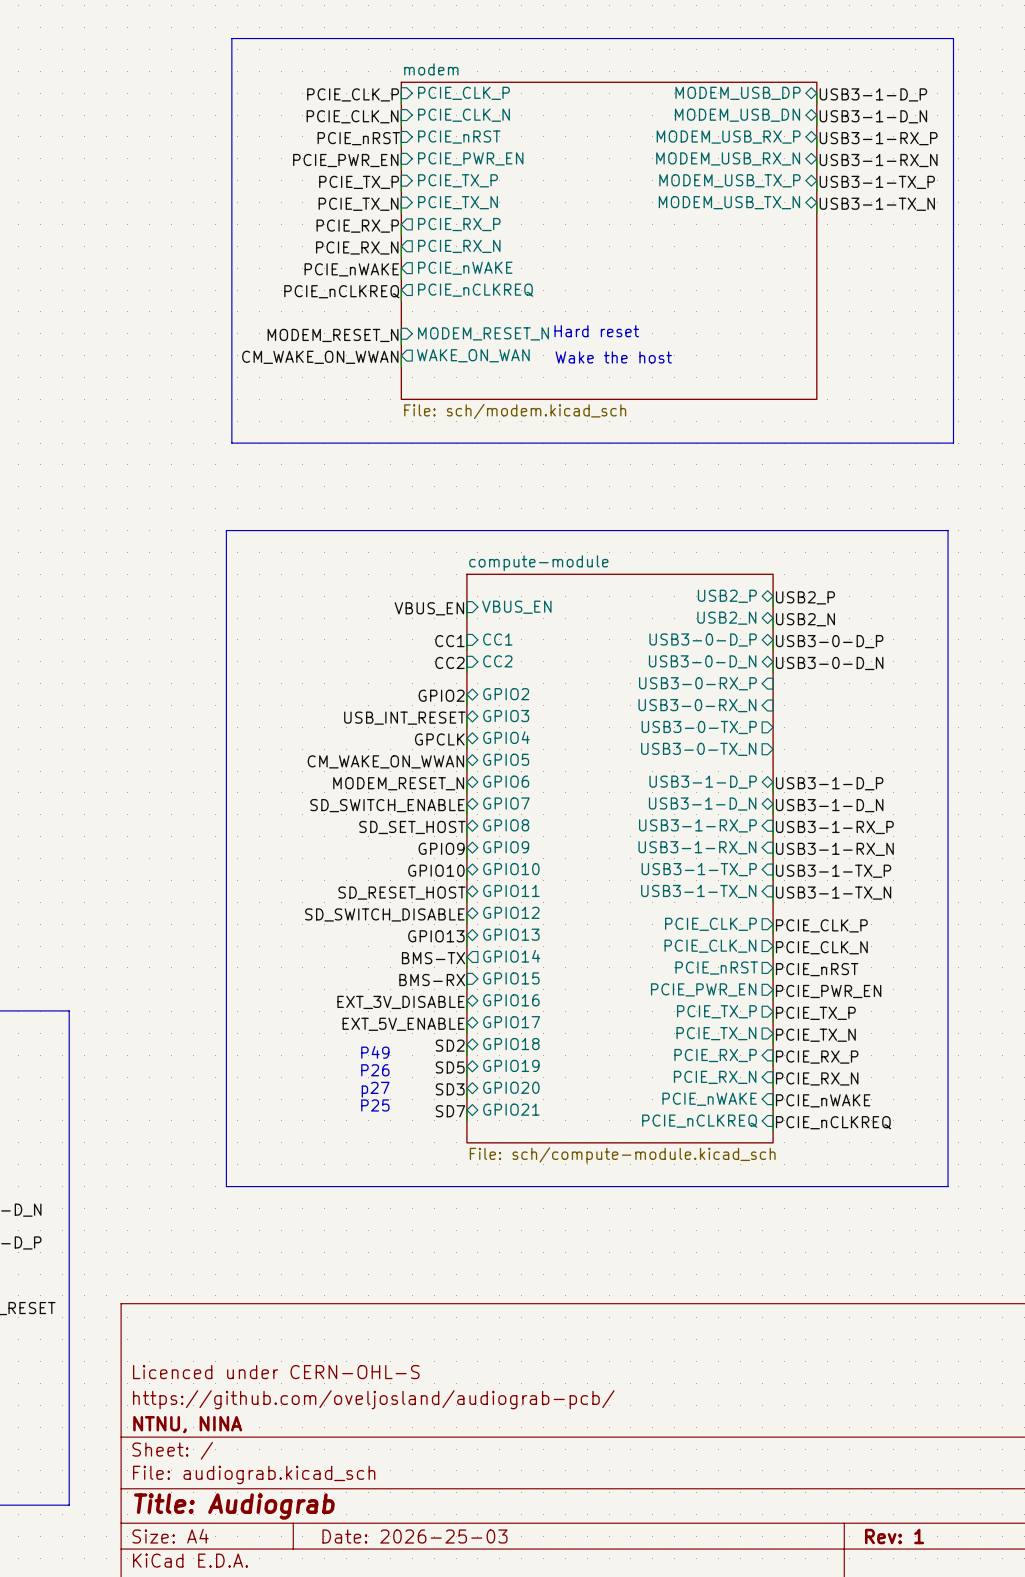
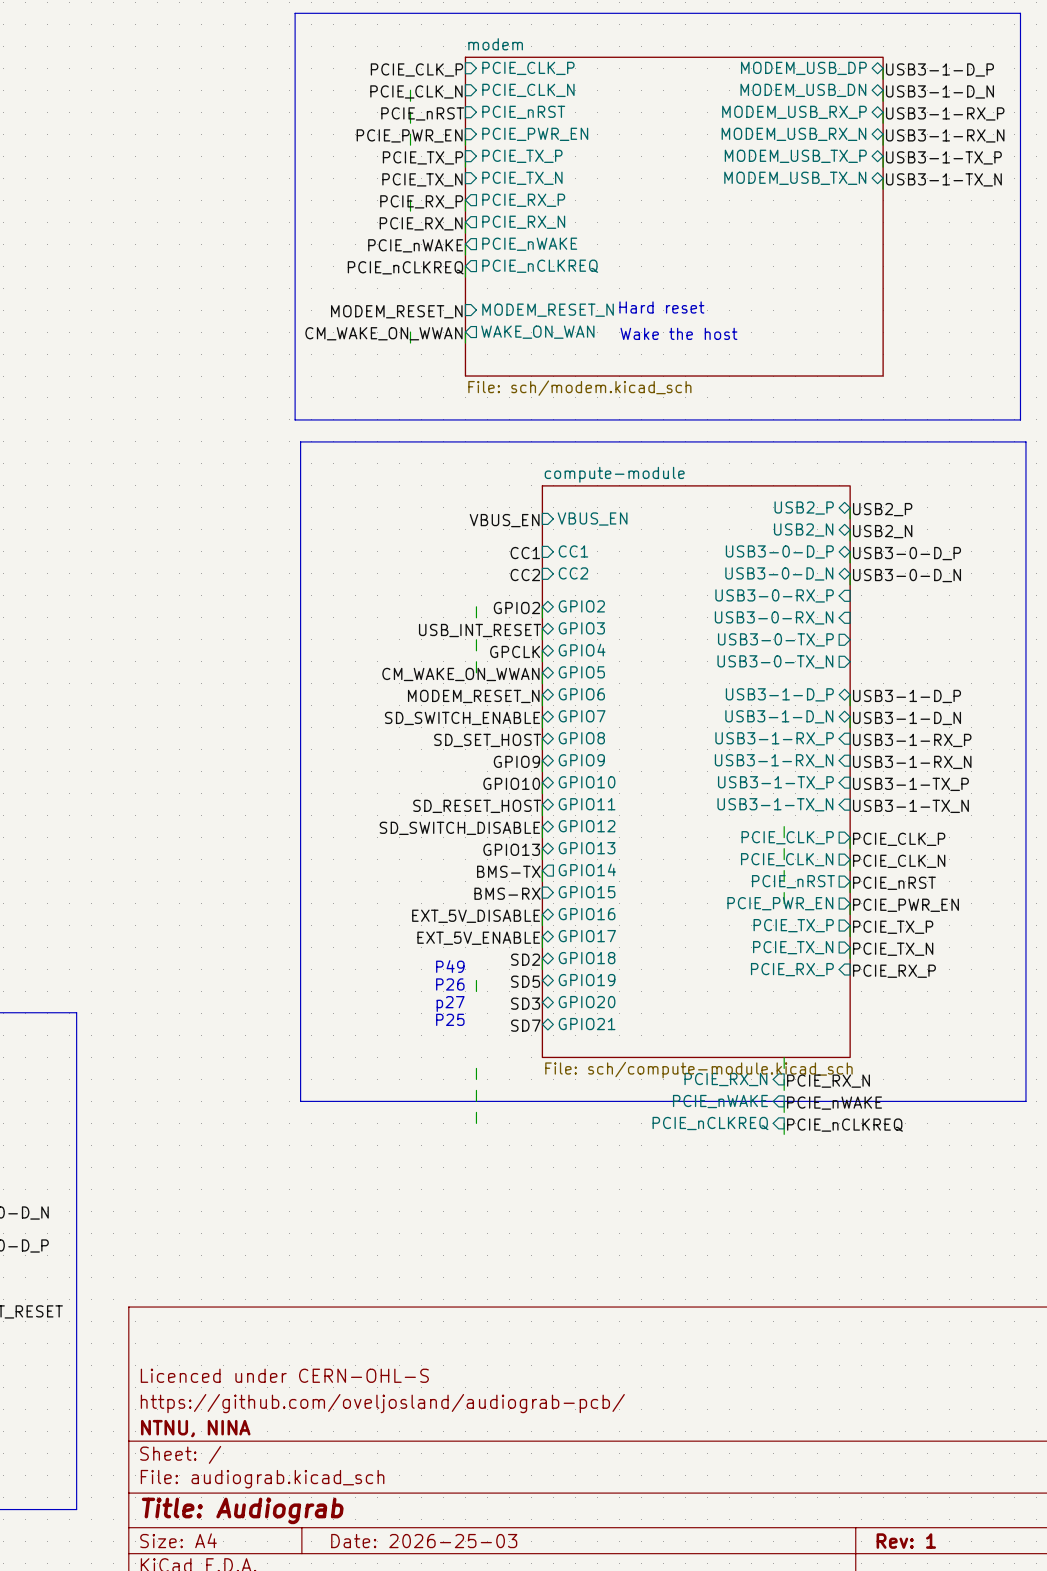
line: none -> (295, 13) (1020, 13) (1020, 419) (295, 419) (295, 13)
sheet pin position: PCIE_CLK_P (463, 93) -> PCIE_CLK_P (528, 68)
sheet pin position: MODEM_USB_DP (738, 93) -> MODEM_USB_DP (803, 68)
wire: (816, 93) (816, 104) -> (883, 68) (883, 79)
label position: PCIE_CLK_P (353, 94) -> PCIE_CLK_P (416, 69)
label position: USB3-1-D_P (873, 94) -> USB3-1-D_P (939, 69)
sheet pin position: PCIE_CLK_N (463, 115) -> PCIE_CLK_N (528, 90)
sheet pin position: MODEM_USB_DN (737, 115) -> MODEM_USB_DN (803, 90)
wire: (816, 115) (816, 126) -> (883, 90) (883, 101)
label position: PCIE_CLK_N (352, 116) -> PCIE_CLK_N (416, 91)
label position: USB3-1-D_N (873, 116) -> USB3-1-D_N (939, 91)
wire: (816, 136) (816, 147) -> (883, 112) (883, 123)
sheet pin position: PCIE_nRST (459, 137) -> PCIE_nRST (523, 112)
sheet pin position: MODEM_USB_RX_P (728, 137) -> MODEM_USB_RX_P (794, 112)
label position: PCIE_nRST (358, 138) -> PCIE_nRST (422, 113)
label position: USB3-1-RX_P (878, 138) -> USB3-1-RX_P (945, 113)
sheet pin position: PCIE_PWR_EN (470, 158) -> PCIE_PWR_EN (535, 134)
sheet pin position: MODEM_USB_RX_N (728, 158) -> MODEM_USB_RX_N (793, 134)
wire: (816, 158) (816, 169) -> (883, 134) (883, 145)
label position: PCIE_PWR_EN (345, 160) -> PCIE_PWR_EN (409, 135)
label position: USB3-1-RX_N (878, 160) -> USB3-1-RX_N (945, 135)
sheet pin position: PCIE_TX_P (457, 180) -> PCIE_TX_P (522, 156)
sheet pin position: MODEM_USB_TX_P (729, 180) -> MODEM_USB_TX_P (795, 156)
wire: (816, 180) (816, 191) -> (883, 156) (883, 167)
label position: PCIE_TX_P (359, 182) -> PCIE_TX_P (422, 157)
label position: USB3-1-TX_P (877, 182) -> USB3-1-TX_P (943, 157)
sheet pin position: PCIE_TX_N (457, 202) -> PCIE_TX_N (522, 178)
sheet pin position: MODEM_USB_TX_N (729, 202) -> MODEM_USB_TX_N (795, 178)
wire: (816, 202) (816, 213) -> (883, 178) (883, 189)
label position: PCIE_TX_N (358, 204) -> PCIE_TX_N (422, 179)
label position: USB3-1-TX_N (877, 204) -> USB3-1-TX_N (943, 179)
wire: (401, 224) (401, 235) -> (465, 200) (465, 211)
sheet pin position: PCIE_RX_P (459, 224) -> PCIE_RX_P (523, 200)
label position: PCIE_RX_P (357, 226) -> PCIE_RX_P (421, 201)
sheet modem position: (609, 240) -> (674, 216)
wire: (401, 246) (401, 257) -> (465, 222) (465, 233)
sheet pin position: PCIE_RX_N (459, 246) -> PCIE_RX_N (523, 222)
label position: PCIE_RX_N (357, 247) -> PCIE_RX_N (421, 223)
wire: (401, 268) (401, 279) -> (465, 244) (465, 255)
sheet pin position: PCIE_nWAKE (465, 268) -> PCIE_nWAKE (529, 244)
label position: PCIE_nWAKE (351, 269) -> PCIE_nWAKE (415, 245)
wire: (401, 290) (401, 300) -> (465, 266) (465, 277)
sheet pin position: PCIE_nCLKREQ (475, 290) -> PCIE_nCLKREQ (540, 266)
label position: PCIE_nCLKREQ (341, 291) -> PCIE_nCLKREQ (405, 267)
text position: Hard reset (596, 331) -> Hard reset (661, 307)
sheet pin position: MODEM_RESET_N (483, 333) -> MODEM_RESET_N (548, 310)
label position: MODEM_RESET_N (333, 335) -> MODEM_RESET_N (396, 311)
wire: (401, 355) (401, 366) -> (465, 332) (465, 343)
sheet pin position: WAKE_ON_WAN (473, 355) -> WAKE_ON_WAN (537, 332)
label position: CM_WAKE_ON_WWAN (320, 357) -> CM_WAKE_ON_WWAN (383, 333)
text position: Wake the host (613, 357) -> Wake the host (678, 333)
line: (291, 443) (231, 443) (231, 38) (953, 38) (953, 443) -> (300, 441) (300, 1101) (1025, 1101) (1025, 441) (965, 441)
line: (226, 530) (948, 530) (948, 1186) (226, 1186) (226, 530) -> none
sheet pin position: USB2_P (727, 596) -> USB2_P (804, 508)
wire: (773, 596) (773, 607) -> (850, 507) (850, 518)
label position: USB2_P (805, 597) -> USB2_P (882, 509)
sheet pin position: VBUS_EN (516, 607) -> VBUS_EN (592, 519)
label position: VBUS_EN (429, 608) -> VBUS_EN (504, 520)
sheet pin position: USB2_N (726, 618) -> USB2_N (803, 529)
wire: (773, 618) (773, 628) -> (850, 529) (850, 540)
label position: USB2_N (805, 619) -> USB2_N (882, 531)
sheet pin position: CC1 (497, 639) -> CC1 (573, 551)
wire: (773, 639) (773, 650) -> (850, 551) (850, 562)
sheet pin position: USB3-0-D_P (703, 640) -> USB3-0-D_P (779, 551)
label position: CC1 (449, 641) -> CC1 (525, 553)
label position: USB3-0-D_P (829, 641) -> USB3-0-D_P (907, 553)
sheet pin position: CC2 (497, 661) -> CC2 (573, 573)
sheet pin position: USB3-0-D_N (702, 661) -> USB3-0-D_N (779, 573)
wire: (773, 661) (773, 672) -> (850, 573) (850, 584)
label position: CC2 (449, 662) -> CC2 (525, 575)
label position: USB3-0-D_N (829, 663) -> USB3-0-D_N (907, 575)
sheet pin position: USB3-0-RX_P (697, 683) -> USB3-0-RX_P (774, 595)
wire: (466, 694) (466, 705) -> (542, 606) (542, 617)
sheet pin position: GPIO2 (506, 694) -> GPIO2 (581, 606)
label position: GPIO2 (441, 695) -> GPIO2 (516, 607)
sheet pin position: USB3-0-RX_N (697, 705) -> USB3-0-RX_N (774, 617)
wire: (466, 716) (466, 727) -> (542, 628) (542, 639)
sheet pin position: GPIO3 (506, 716) -> GPIO3 (581, 628)
label position: USB_INT_RESET (404, 718) -> USB_INT_RESET (480, 630)
sheet pin position: USB3-0-TX_P (699, 727) -> USB3-0-TX_P (775, 639)
sheet pin position: GPIO4 (506, 737) -> GPIO4 (582, 650)
wire: (466, 738) (466, 749) -> (542, 650) (542, 661)
label position: GPCLK (439, 739) -> GPCLK (515, 651)
sheet pin position: USB3-0-TX_N (698, 749) -> USB3-0-TX_N (775, 661)
sheet pin position: GPIO5 (506, 759) -> GPIO5 (581, 672)
wire: (466, 760) (466, 771) -> (542, 672) (542, 683)
label position: CM_WAKE_ON_WWAN (385, 761) -> CM_WAKE_ON_WWAN (460, 674)
sheet pin position: GPIO6 (506, 781) -> GPIO6 (581, 694)
wire: (466, 782) (466, 792) -> (542, 694) (542, 705)
sheet pin position: USB3-1-D_P (703, 782) -> USB3-1-D_P (779, 694)
wire: (773, 782) (773, 792) -> (850, 694) (850, 705)
label position: MODEM_RESET_N (398, 783) -> MODEM_RESET_N (473, 696)
label position: USB3-1-D_P (829, 783) -> USB3-1-D_P (907, 696)
wire: (466, 803) (466, 814) -> (542, 716) (542, 727)
sheet pin position: GPIO7 (506, 803) -> GPIO7 (582, 716)
wire: (773, 803) (773, 814) -> (850, 716) (850, 727)
sheet pin position: USB3-1-D_N (702, 804) -> USB3-1-D_N (779, 716)
label position: SD_SWITCH_ENABLE (387, 805) -> SD_SWITCH_ENABLE (462, 718)
label position: USB3-1-D_N (829, 805) -> USB3-1-D_N (907, 718)
wire: (466, 825) (466, 836) -> (542, 738) (542, 749)
sheet pin position: GPIO8 (506, 825) -> GPIO8 (581, 738)
sheet pin position: USB3-1-RX_P (697, 825) -> USB3-1-RX_P (774, 738)
label position: SD_SET_HOST (412, 827) -> SD_SET_HOST (487, 740)
label position: USB3-1-RX_P (834, 827) -> USB3-1-RX_P (912, 740)
wire: (466, 847) (466, 858) -> (542, 760) (542, 771)
sheet pin position: GPIO9 (506, 847) -> GPIO9 (581, 760)
sheet pin position: USB3-1-RX_N (697, 847) -> USB3-1-RX_N (774, 760)
label position: GPIO9 (441, 848) -> GPIO9 (516, 761)
label position: USB3-1-RX_N (834, 849) -> USB3-1-RX_N (912, 762)
sheet compute-module position: (620, 858) -> (696, 771)
wire: (466, 869) (466, 880) -> (542, 782) (542, 793)
sheet pin position: GPIO10 (511, 869) -> GPIO10 (587, 782)
sheet pin position: USB3-1-TX_P (699, 869) -> USB3-1-TX_P (775, 782)
label position: GPIO10 (436, 870) -> GPIO10 (511, 783)
label position: USB3-1-TX_P (833, 871) -> USB3-1-TX_P (910, 784)
sheet pin position: GPIO11 (511, 890) -> GPIO11 (587, 804)
wire: (466, 891) (466, 902) -> (542, 804) (542, 815)
sheet pin position: USB3-1-TX_N (698, 891) -> USB3-1-TX_N (775, 804)
label position: SD_RESET_HOST (402, 893) -> SD_RESET_HOST (477, 806)
label position: USB3-1-TX_N (833, 893) -> USB3-1-TX_N (910, 806)
sheet pin position: GPIO12 (511, 912) -> GPIO12 (587, 826)
wire: (466, 913) (466, 924) -> (542, 826) (542, 837)
label position: SD_SWITCH_DISABLE (384, 914) -> SD_SWITCH_DISABLE (459, 828)
label: none -> EXT_5V_DISABLE (476, 916)
sheet pin position: PCIE_CLK_P (710, 924) -> PCIE_CLK_P (787, 837)
wire: (773, 924) (773, 935) -> (850, 837) (850, 848)
label position: PCIE_CLK_P (821, 925) -> PCIE_CLK_P (899, 839)
sheet pin position: GPIO13 (511, 934) -> GPIO13 (587, 848)
wire: (466, 935) (466, 946) -> (542, 848) (542, 859)
label position: GPIO13 (436, 936) -> GPIO13 (511, 849)
sheet pin position: PCIE_CLK_N (710, 946) -> PCIE_CLK_N (787, 859)
wire: (773, 946) (773, 956) -> (850, 859) (850, 870)
label position: PCIE_CLK_N (821, 947) -> PCIE_CLK_N (899, 861)
wire: (466, 956) (466, 967) -> (542, 870) (542, 881)
sheet pin position: GPIO14 (511, 956) -> GPIO14 (587, 869)
label position: BMS-TX (433, 958) -> BMS-TX (508, 871)
wire: (773, 967) (773, 978) -> (850, 881) (850, 892)
sheet pin position: PCIE_nRST (716, 968) -> PCIE_nRST (793, 881)
label position: PCIE_nRST (817, 969) -> PCIE_nRST (894, 883)
sheet pin position: GPIO15 (511, 978) -> GPIO15 (587, 892)
label position: BMS-RX (432, 980) -> BMS-RX (507, 893)
sheet pin position: PCIE_PWR_EN (703, 989) -> PCIE_PWR_EN (780, 903)
wire: (773, 989) (773, 1000) -> (850, 903) (850, 914)
label position: PCIE_PWR_EN (828, 991) -> PCIE_PWR_EN (905, 905)
wire: (466, 1000) (466, 1011) -> (542, 914) (542, 925)
sheet pin position: GPIO16 (511, 1000) -> GPIO16 (587, 914)
label: EXT_3V_DISABLE (400, 1002) -> none
sheet pin position: PCIE_TX_P (716, 1011) -> PCIE_TX_P (793, 925)
wire: (773, 1011) (773, 1022) -> (850, 925) (850, 936)
label position: PCIE_TX_P (815, 1013) -> PCIE_TX_P (893, 927)
wire: (466, 1022) (466, 1033) -> (542, 936) (542, 947)
sheet pin position: GPIO17 (511, 1022) -> GPIO17 (587, 936)
label position: EXT_5V_ENABLE (403, 1024) -> EXT_5V_ENABLE (478, 938)
sheet pin position: PCIE_TX_N (716, 1033) -> PCIE_TX_N (793, 947)
wire: (773, 1033) (773, 1044) -> (850, 947) (850, 958)
label position: PCIE_TX_N (815, 1035) -> PCIE_TX_N (893, 949)
wire: (466, 1044) (466, 1055) -> (542, 958) (542, 969)
sheet pin position: GPIO18 (511, 1044) -> GPIO18 (587, 958)
label position: SD2 (450, 1045) -> SD2 (525, 959)
text position: P49 (375, 1052) -> P49 (450, 966)
sheet pin position: PCIE_RX_P (715, 1055) -> PCIE_RX_P (792, 969)
label position: PCIE_RX_P (817, 1057) -> PCIE_RX_P (894, 971)
sheet pin position: GPIO19 (511, 1065) -> GPIO19 (587, 980)
label position: SD5 (450, 1067) -> SD5 (525, 981)
text position: P26 (375, 1070) -> P26 (450, 984)
sheet pin position: GPIO20 (511, 1087) -> GPIO20 (587, 1002)
text position: p27 (375, 1089) -> p27 (450, 1003)
label position: SD3 (450, 1089) -> SD3 (525, 1003)
text position: P25 (375, 1105) -> P25 (450, 1019)
sheet pin position: GPIO21 (511, 1109) -> GPIO21 (587, 1024)
label position: SD7 (450, 1111) -> SD7 (525, 1025)

